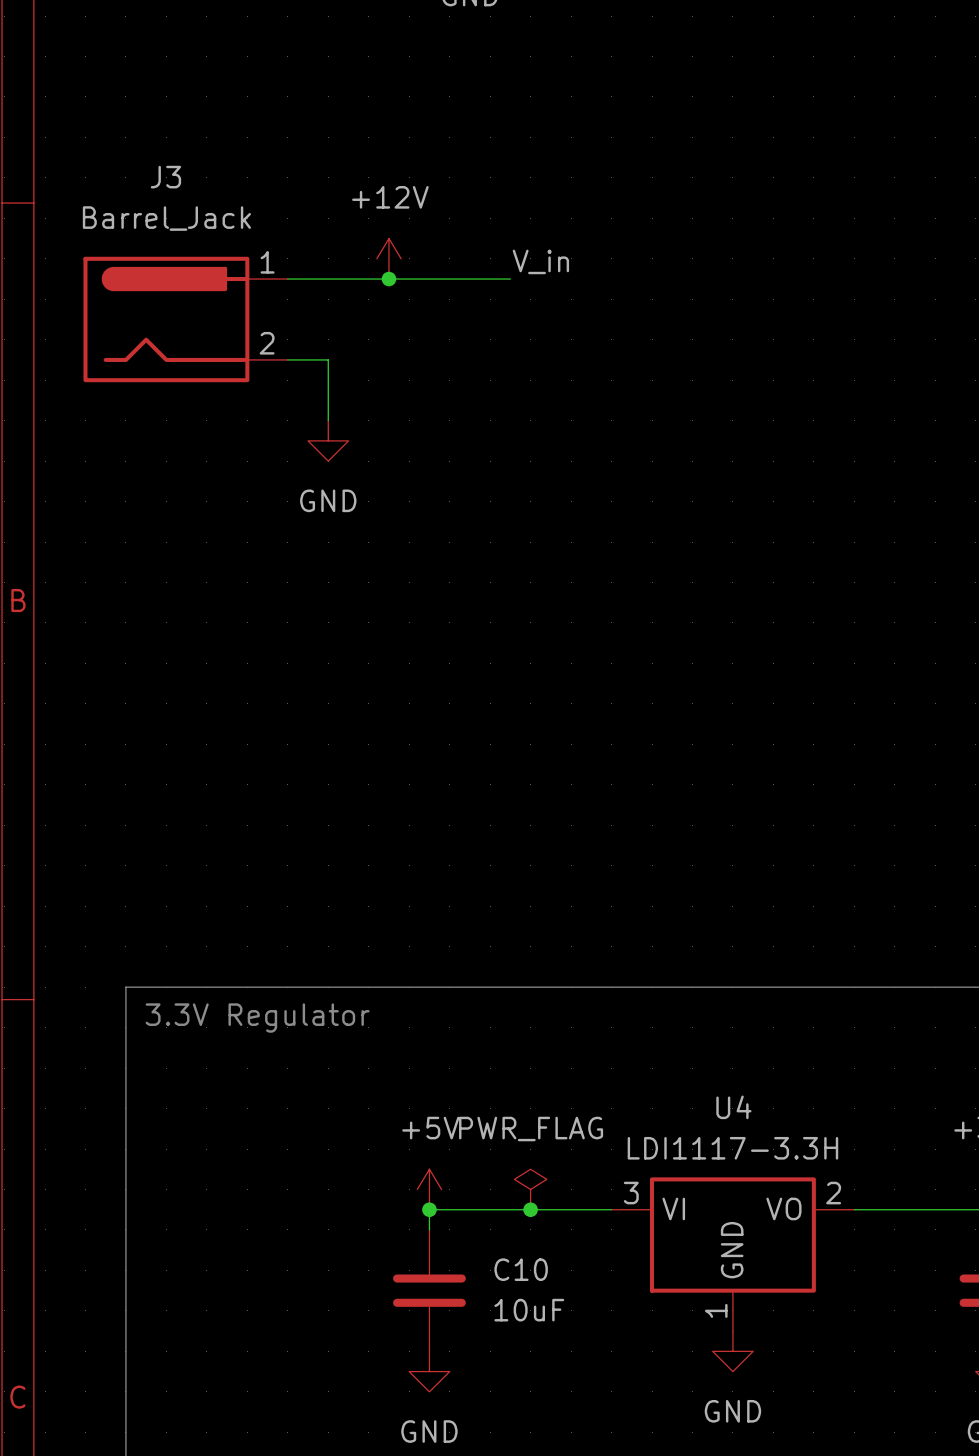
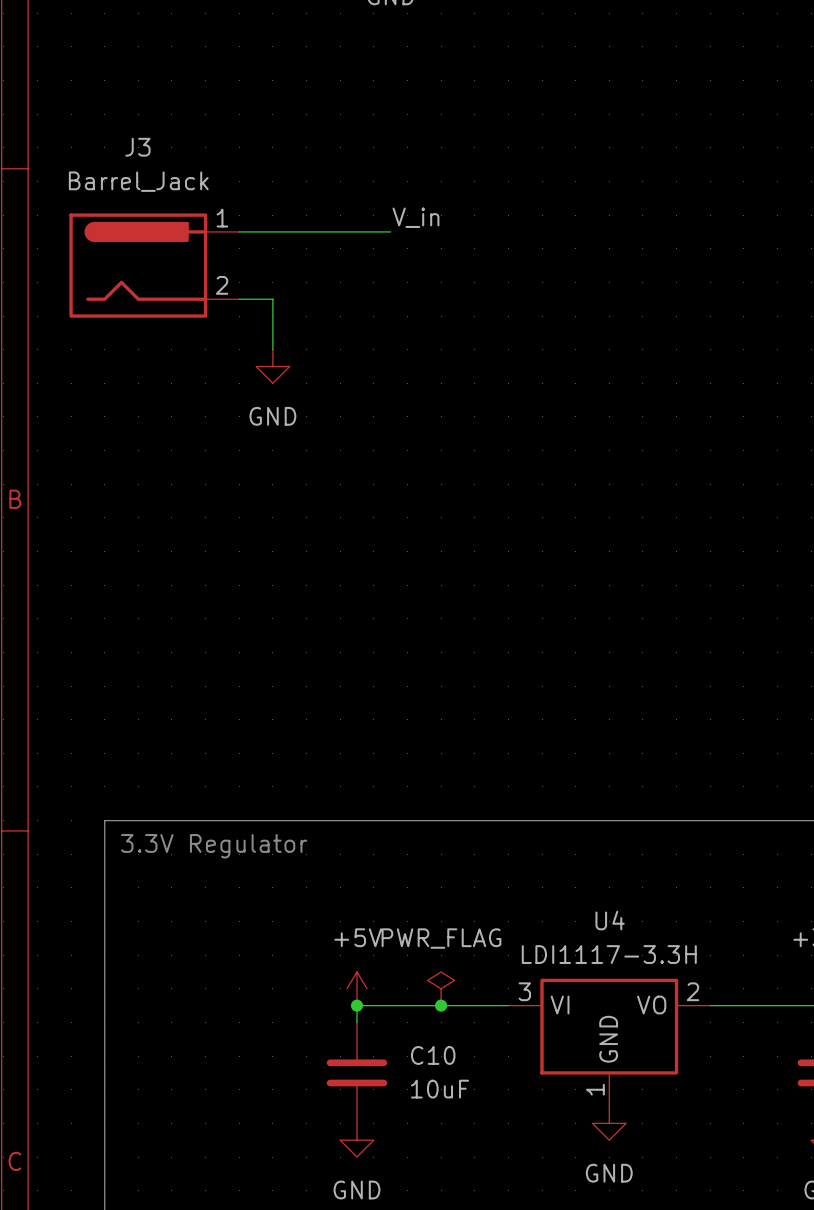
power symbol: +12V (388, 258) -> none
label position: V_in (540, 261) -> V_in (415, 217)
junction: (388, 279) -> none
wire: (469, 279) (510, 279) -> none

